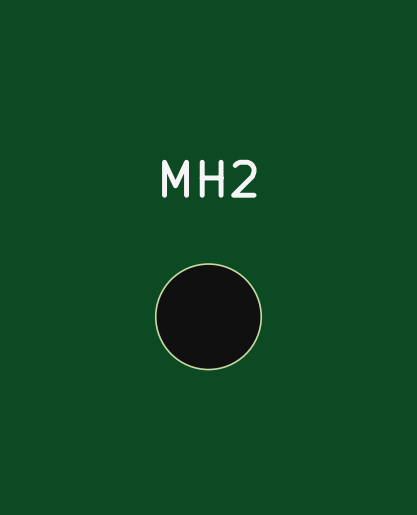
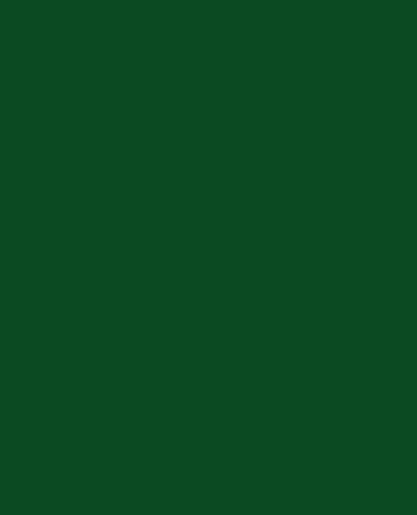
MH2: (208, 316) -> none

